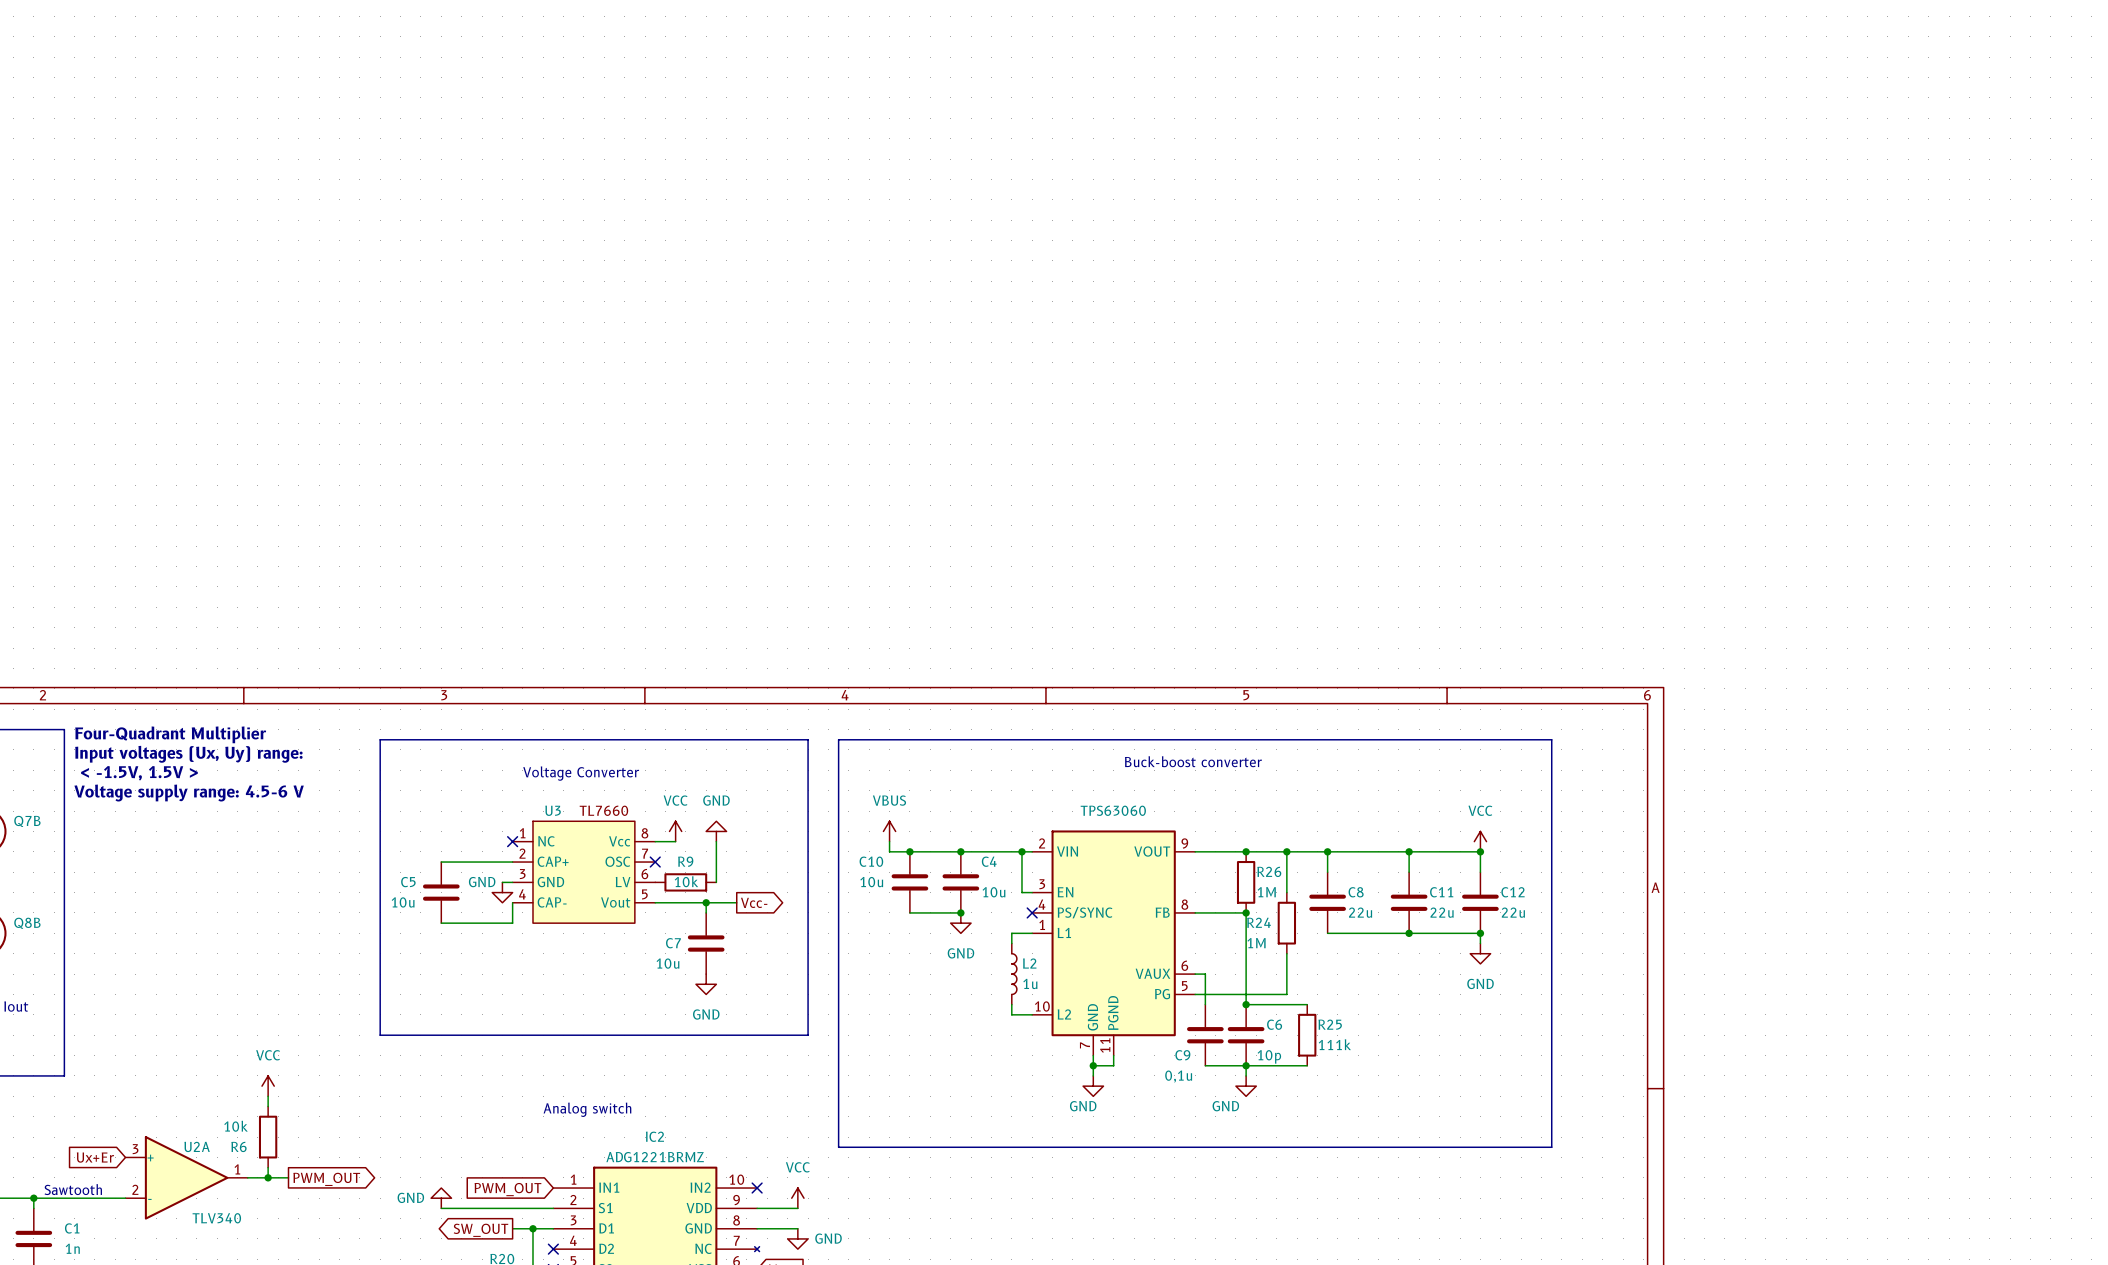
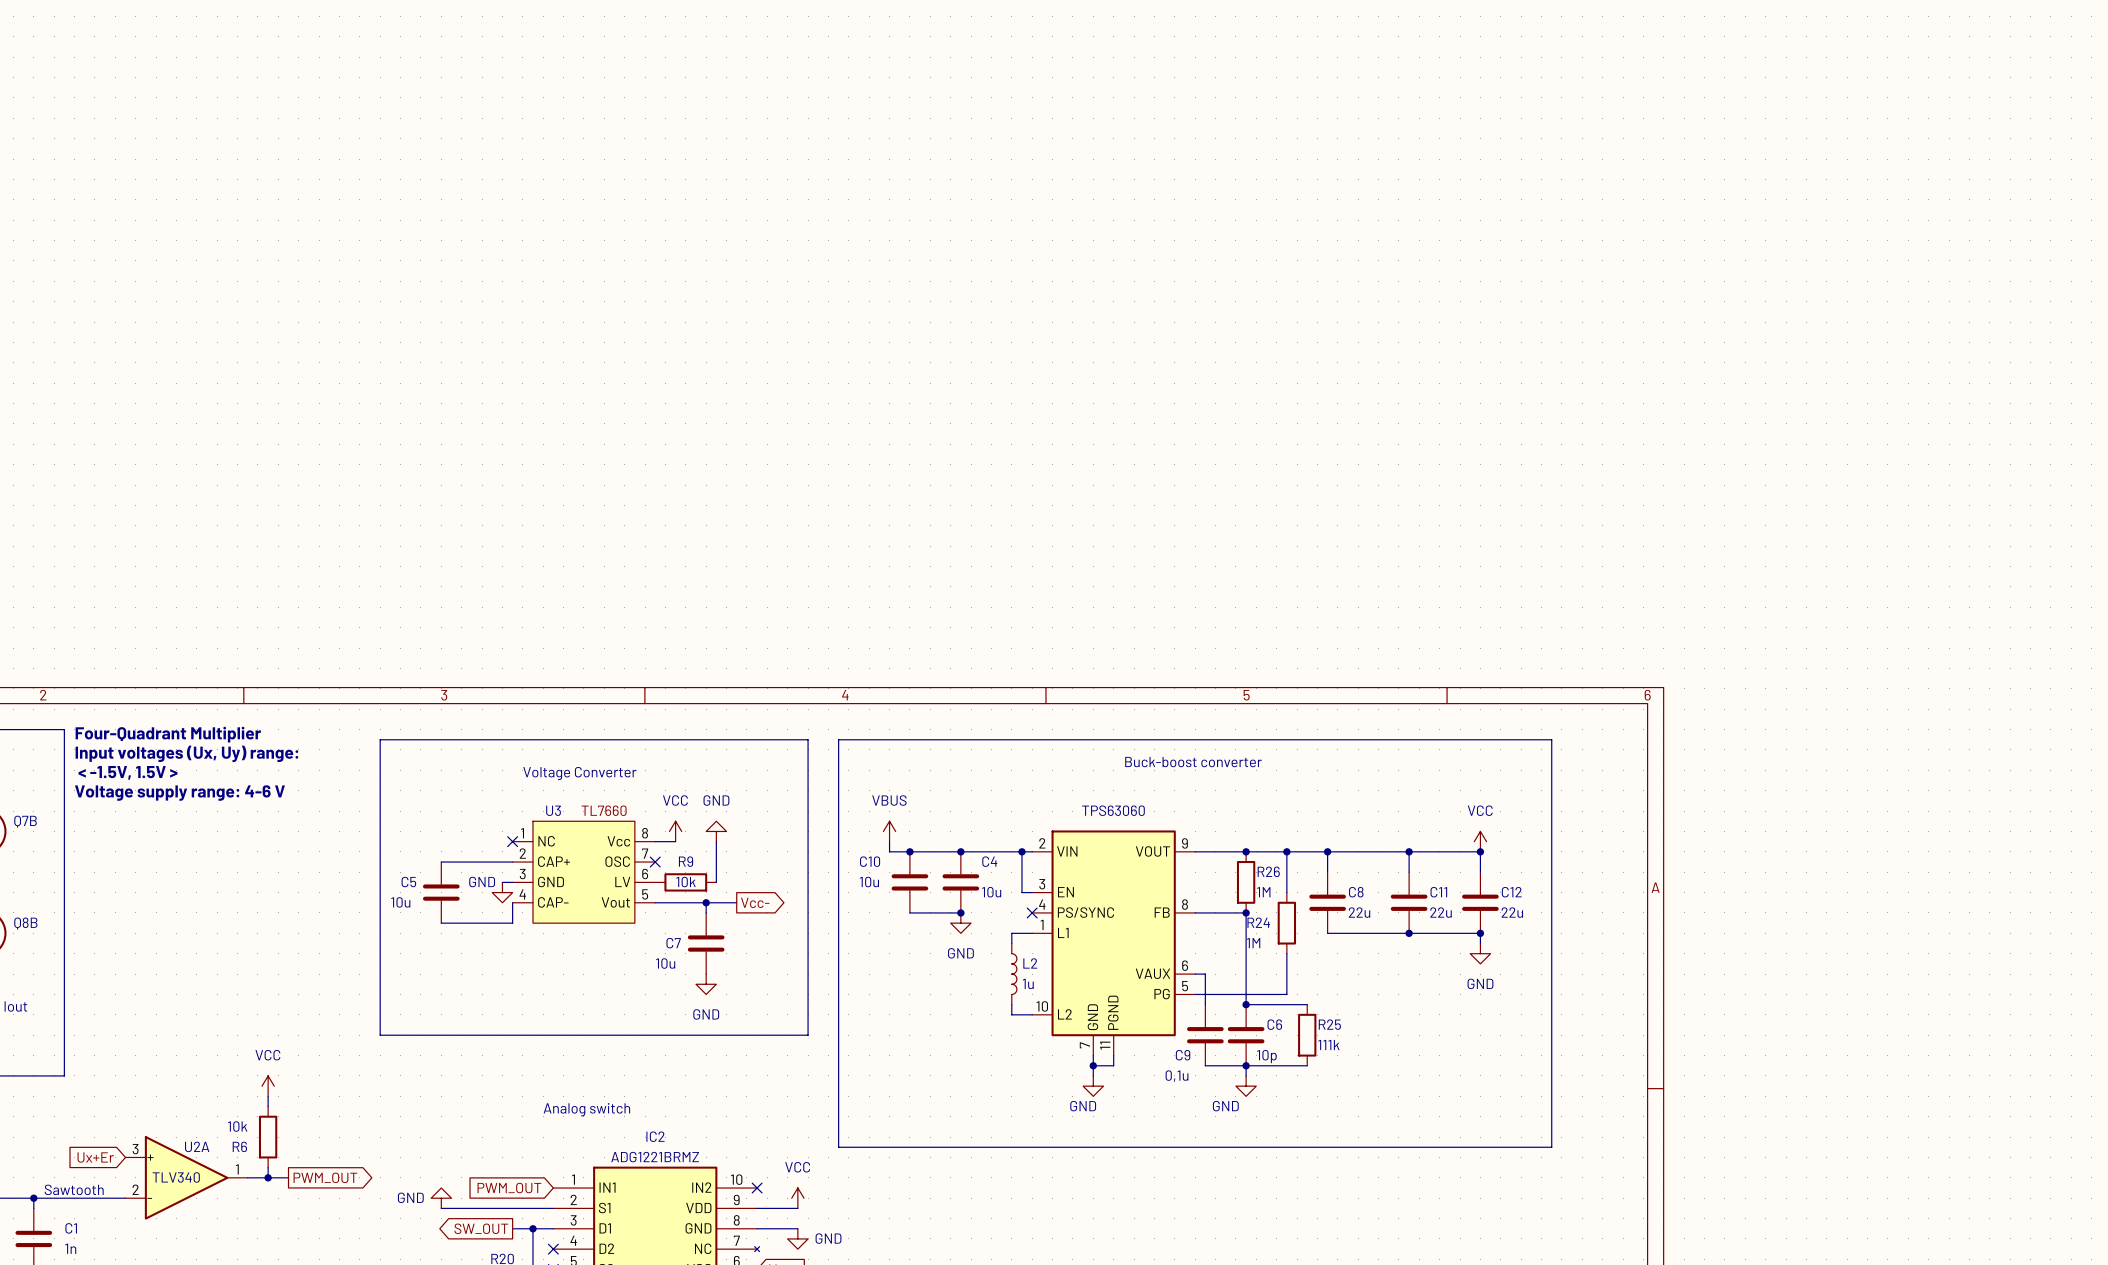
text: Voltage supply range: 4.5-6 V (189, 793) -> Voltage supply range: 4-6 V (179, 793)
U2A value position: TLV340 (216, 1218) -> TLV340 (176, 1177)

